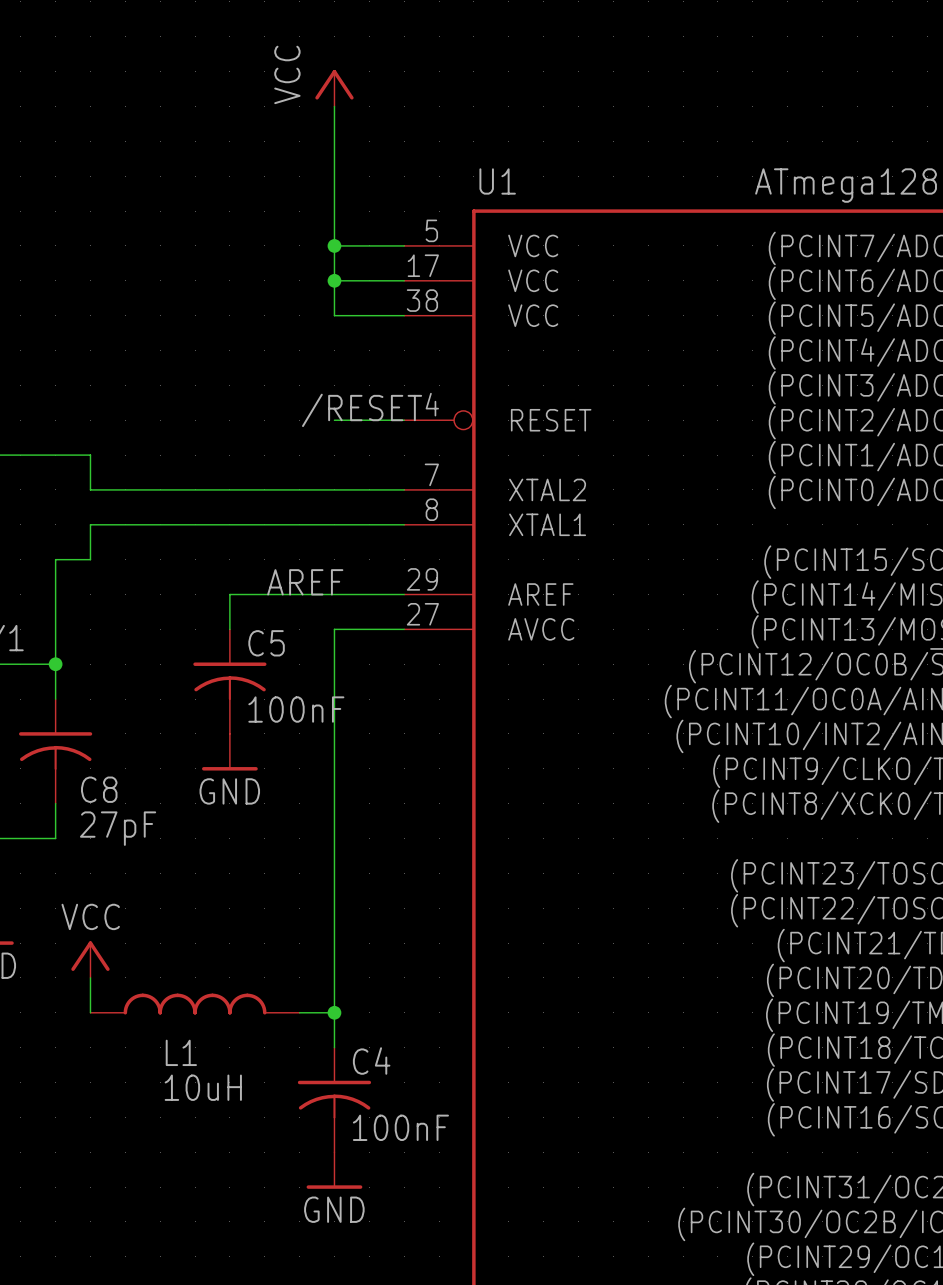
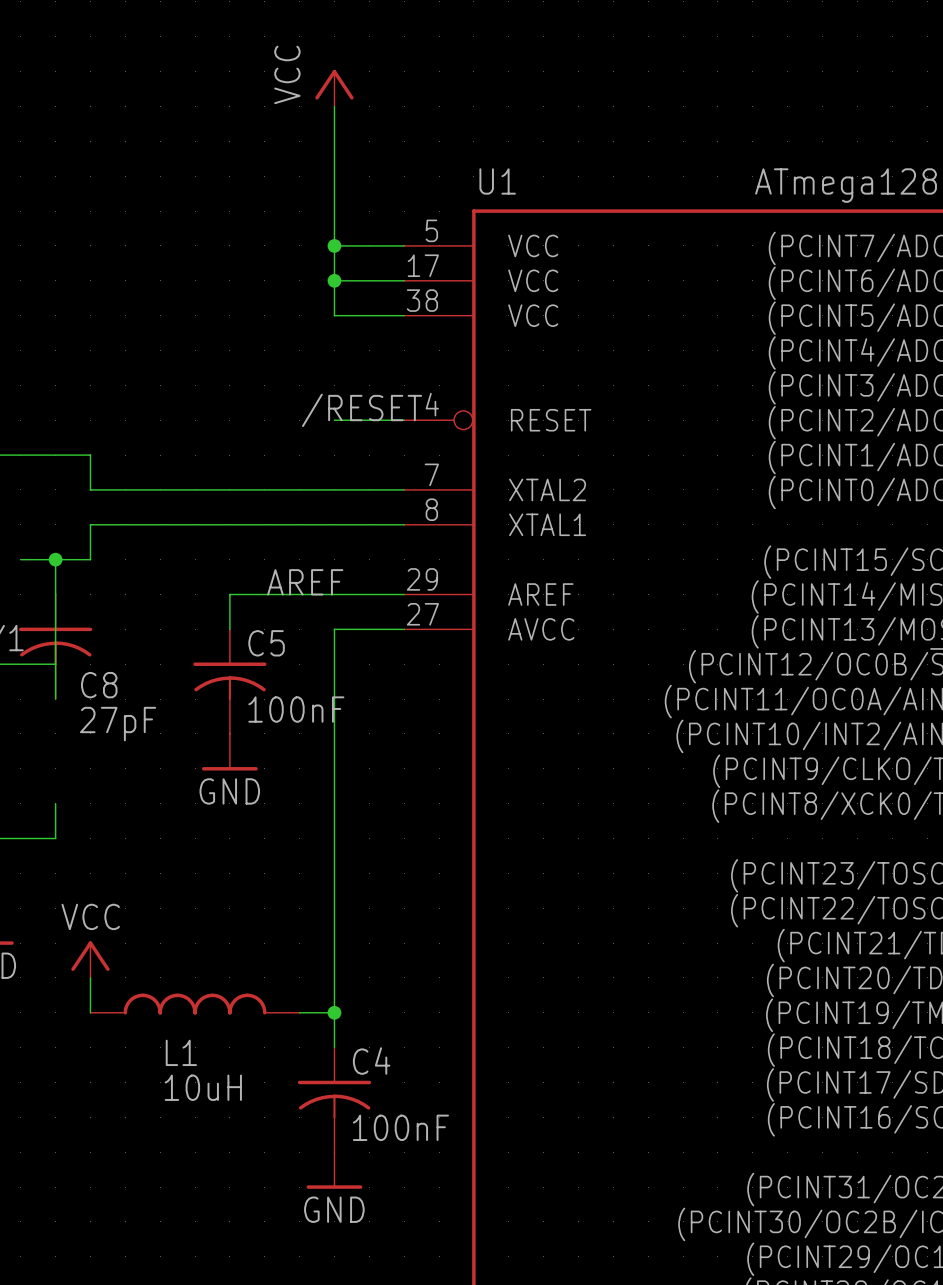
wire: none -> (20, 559) (55, 559)
junction: none -> (55, 559)
junction: (55, 664) -> none
C8 position: (55, 751) -> (55, 646)

